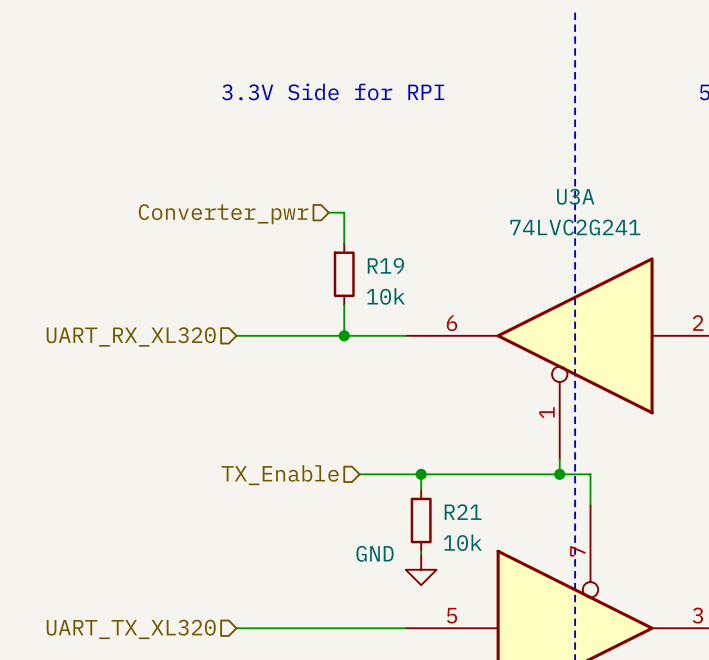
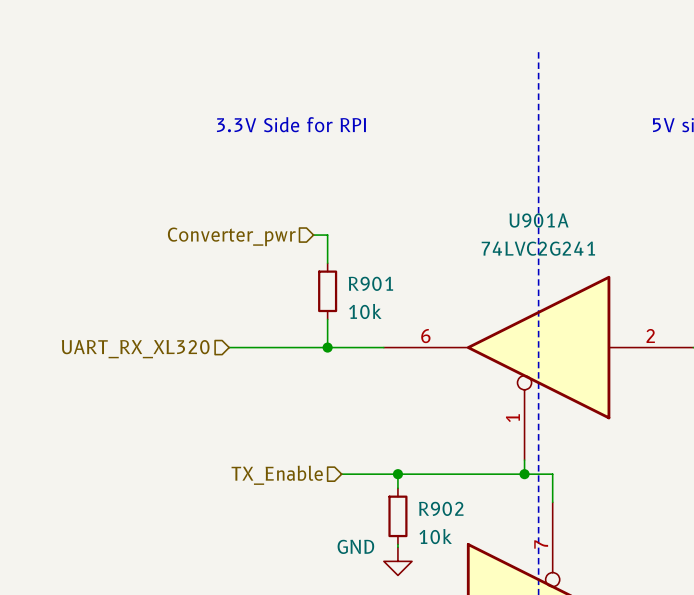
U3A name: U3A (575, 196) -> U901A (539, 220)
R19 name: R19 (385, 265) -> R901 (370, 283)
R21 name: R21 (463, 512) -> R902 (441, 508)

